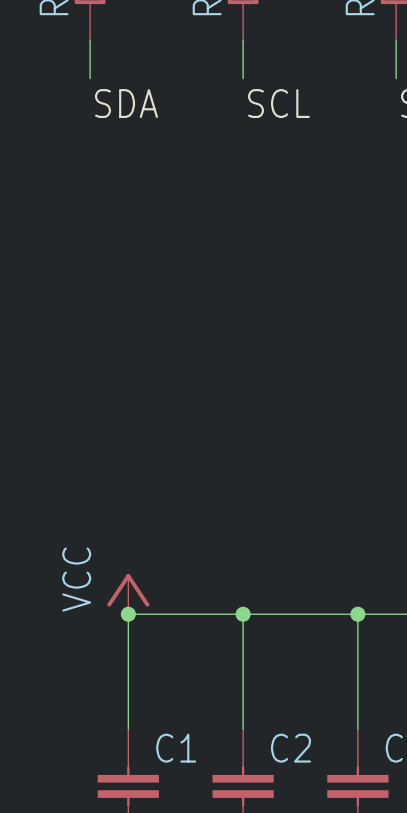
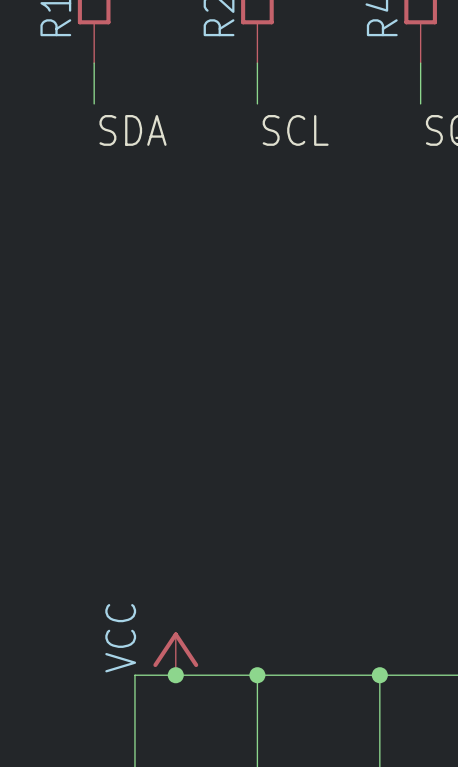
power symbol position: VCC (128, 594) -> VCC (175, 653)
junction position: (128, 614) -> (175, 675)

